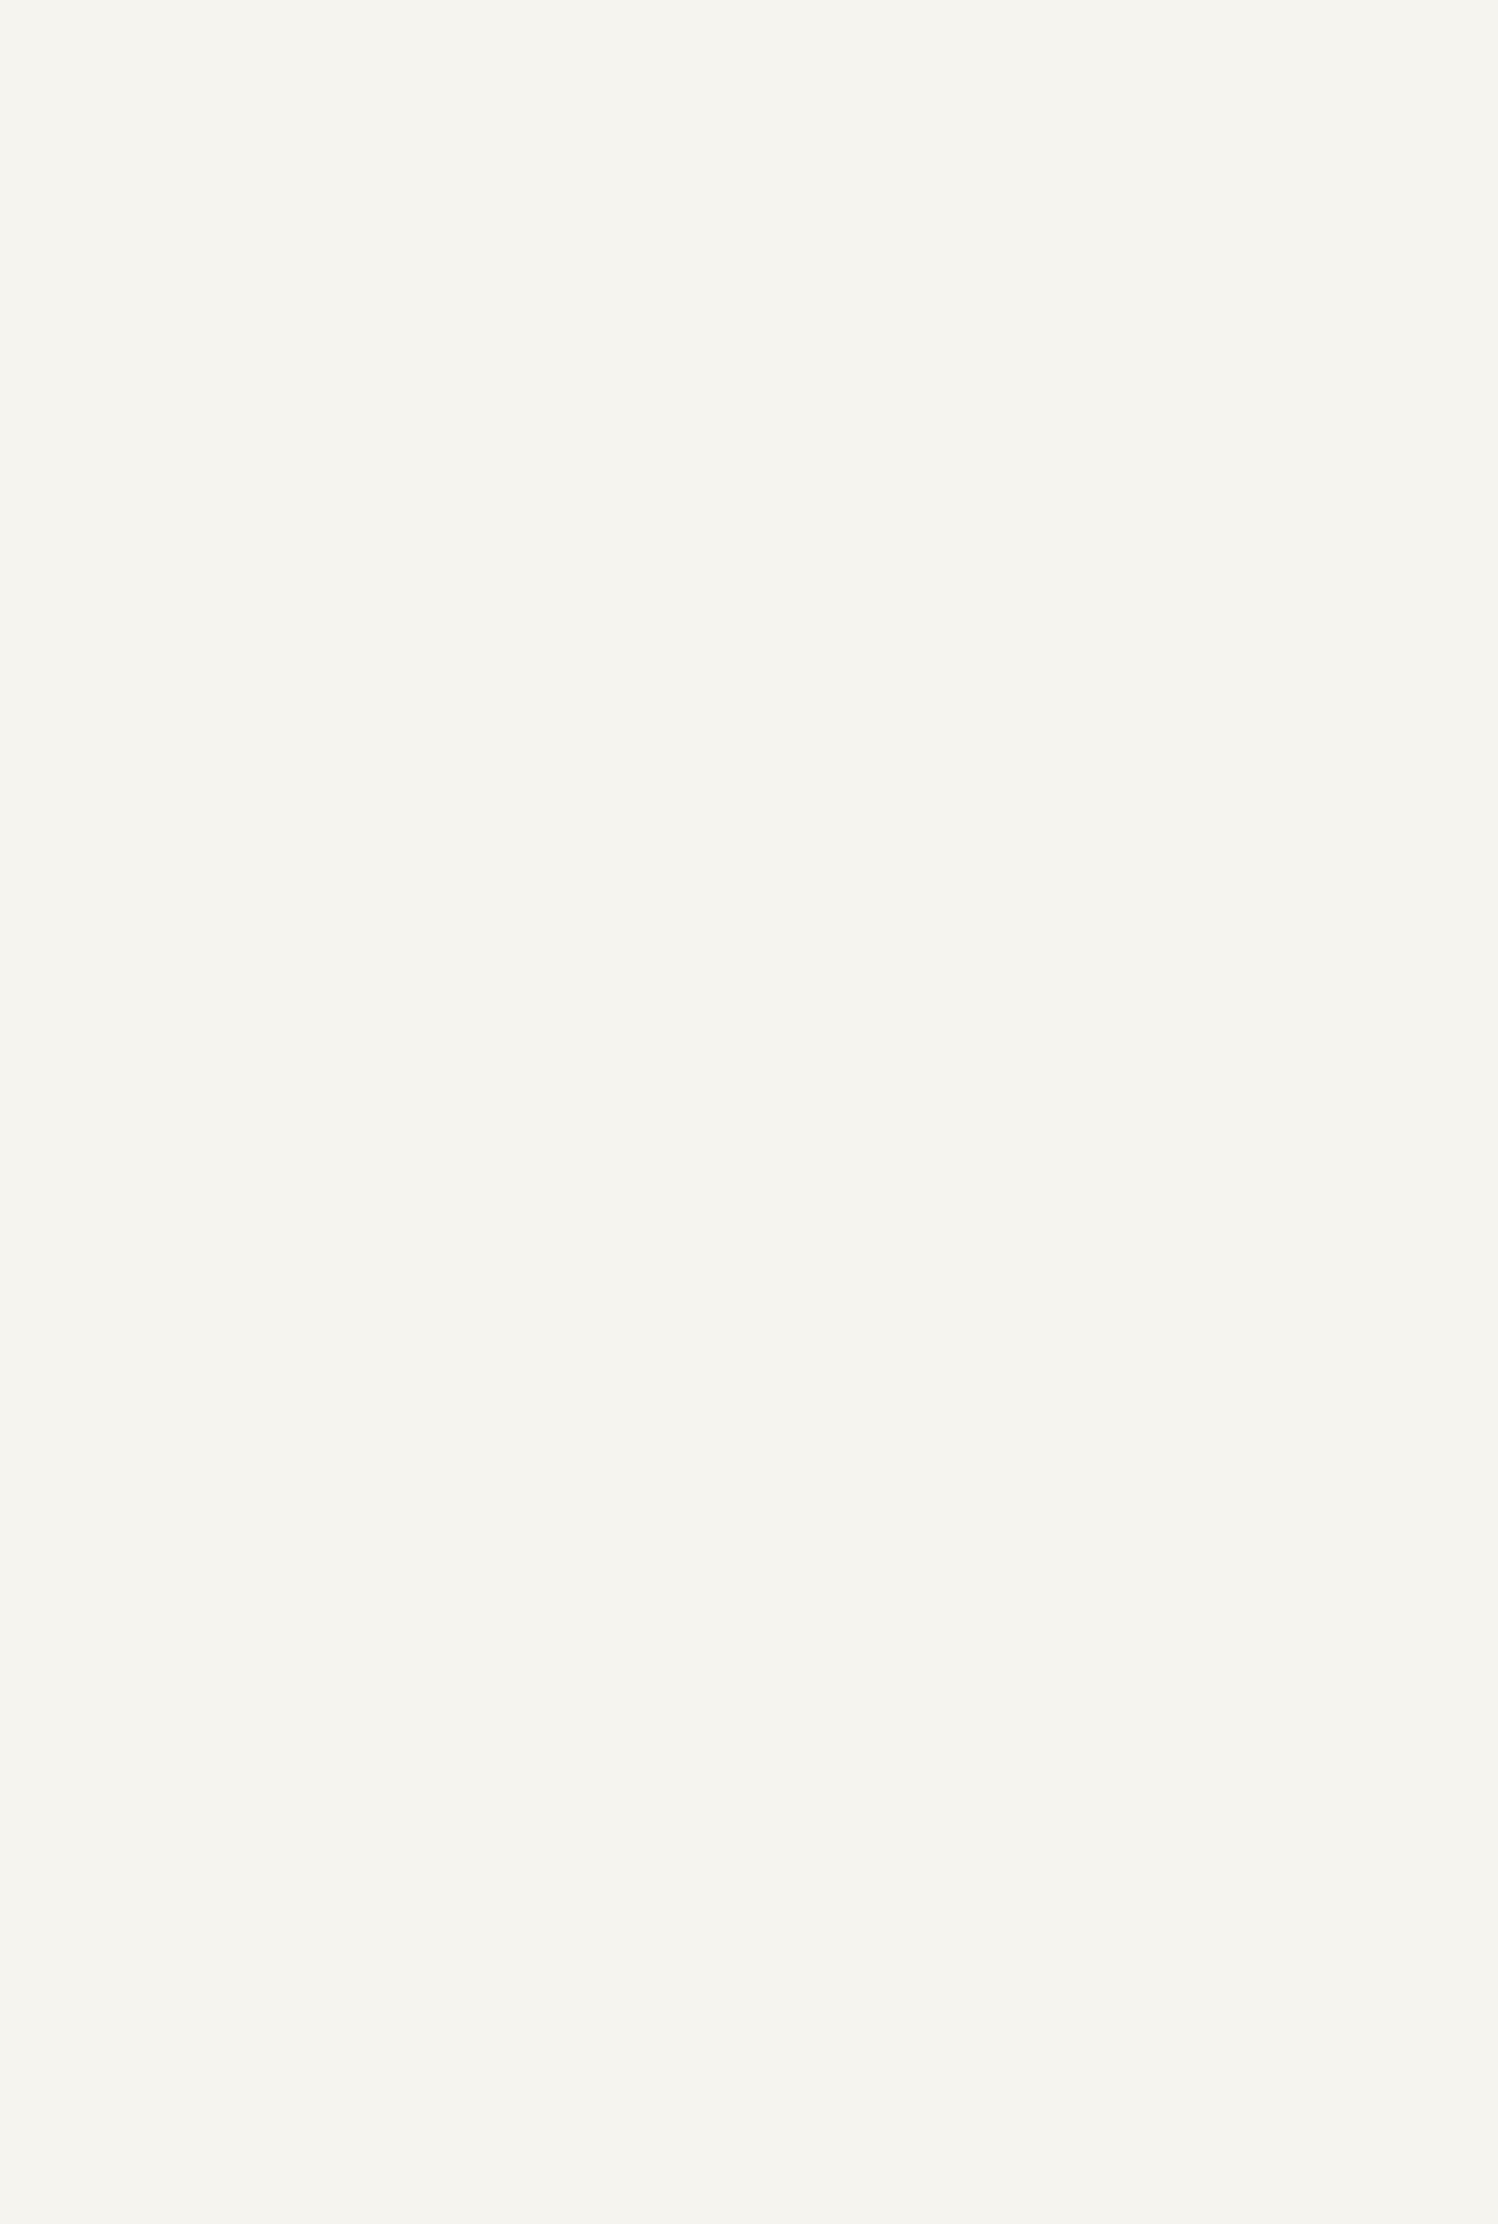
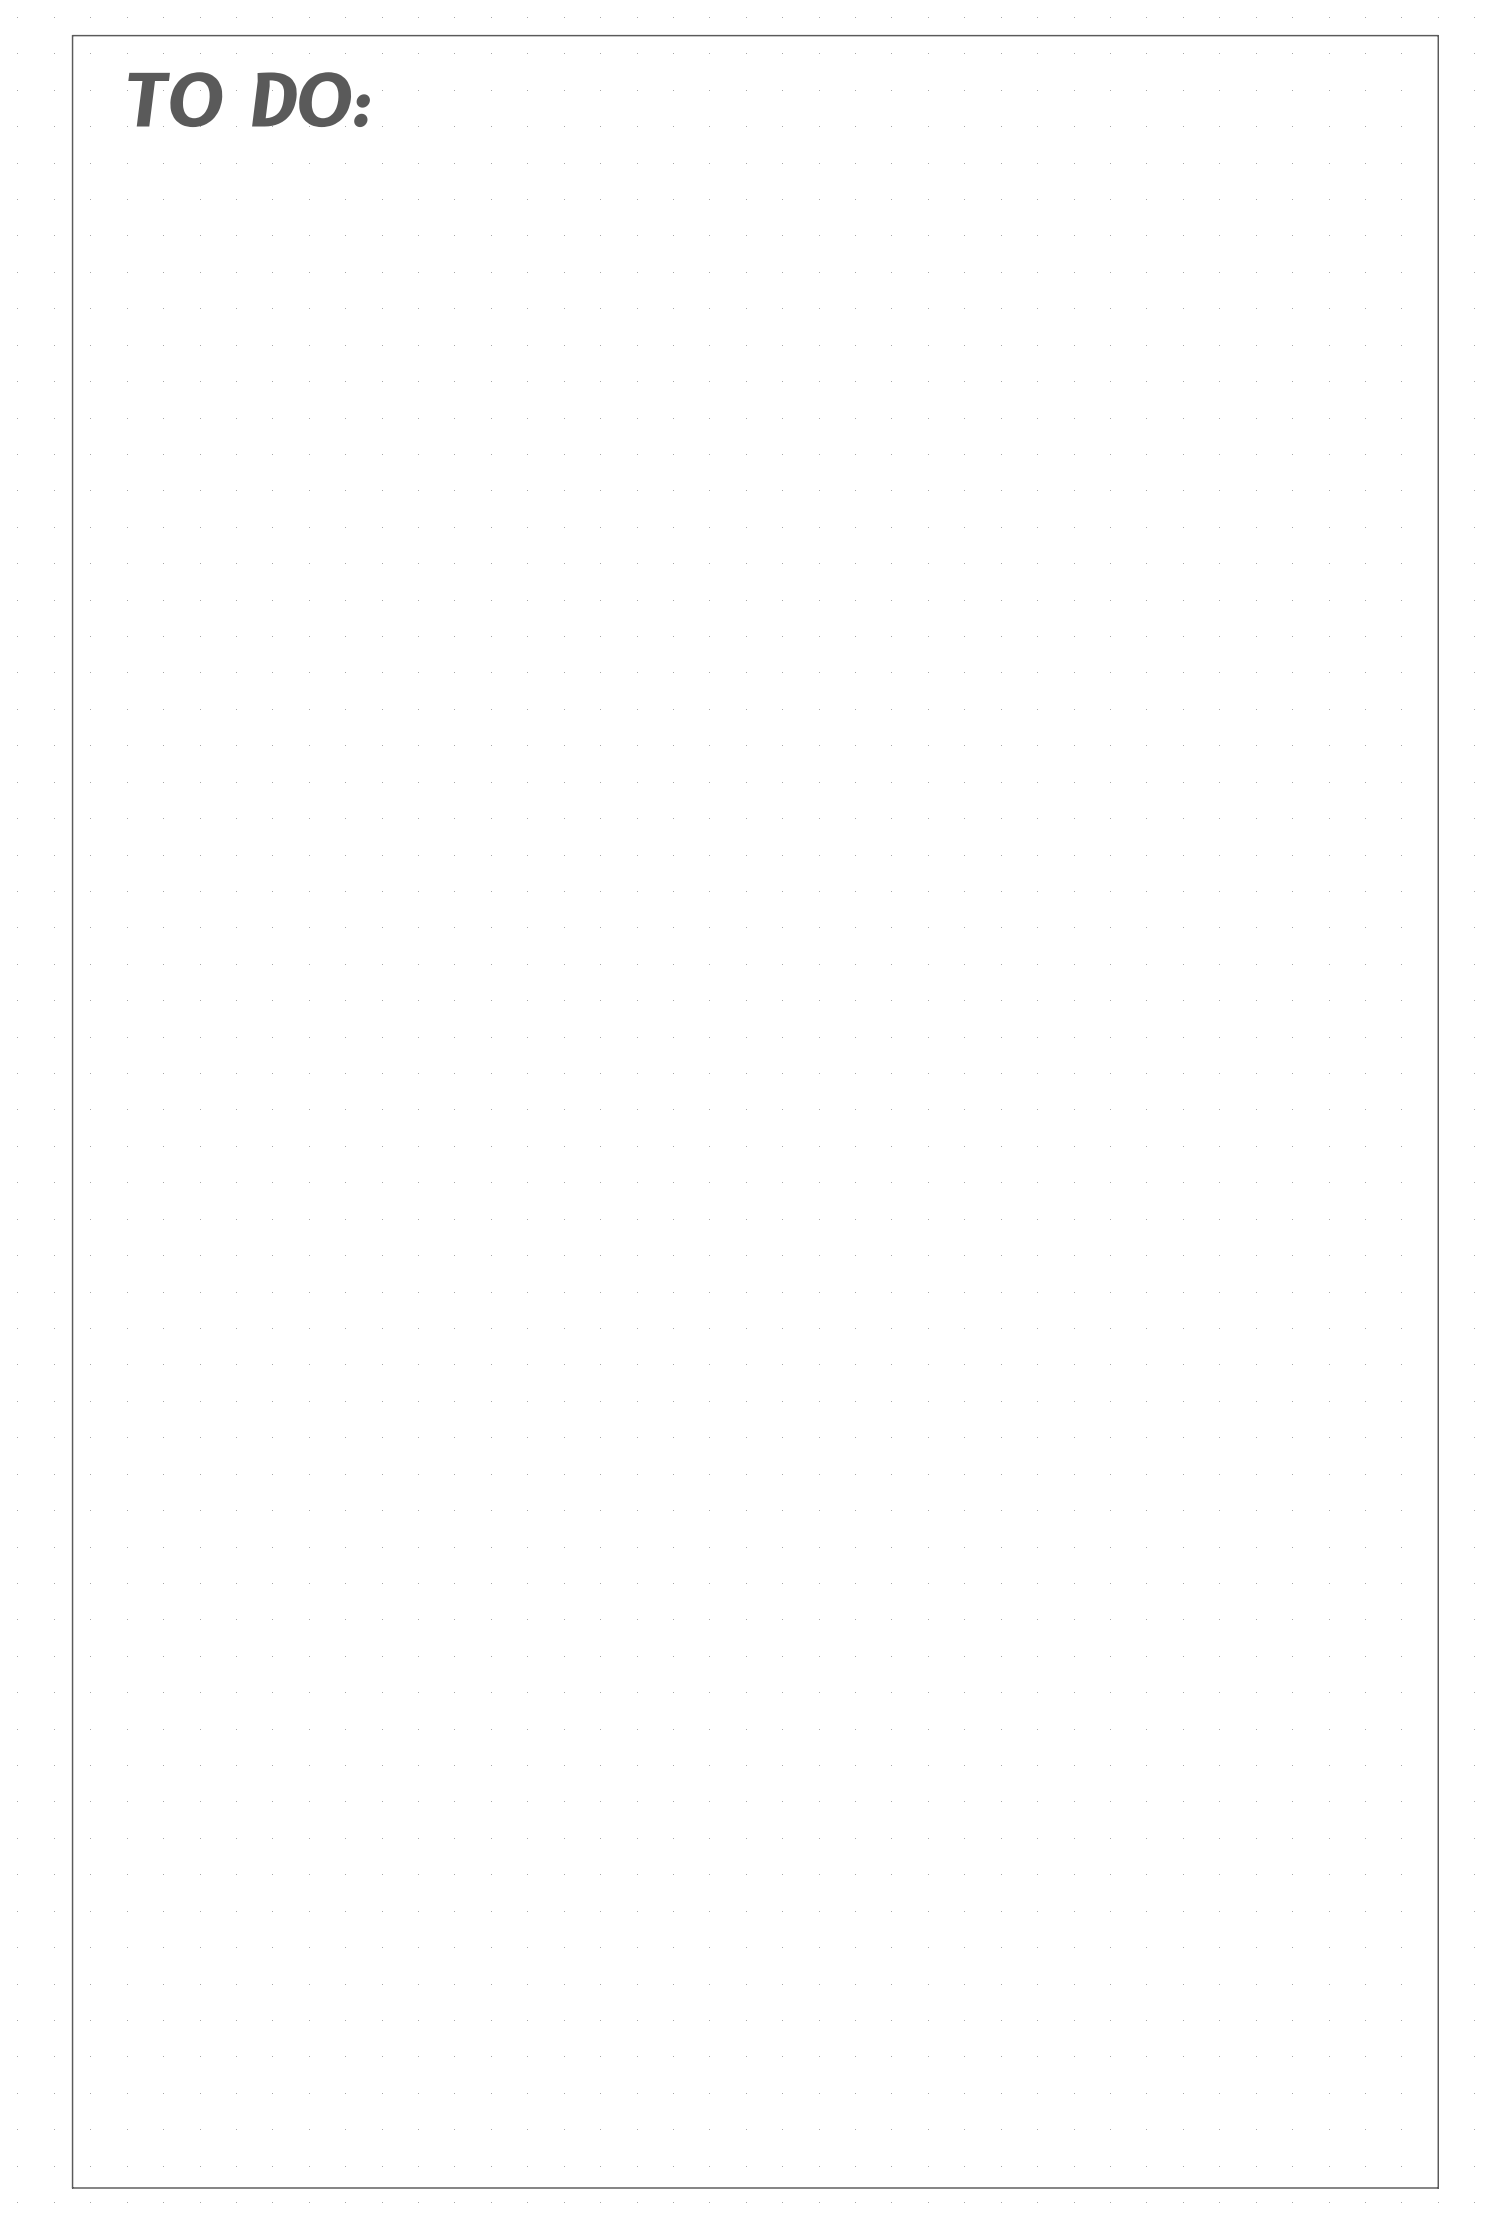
line: none -> (72, 35) (72, 2187) (1438, 2187) (1438, 35) (72, 35)
text: none -> TO DO: (249, 99)

